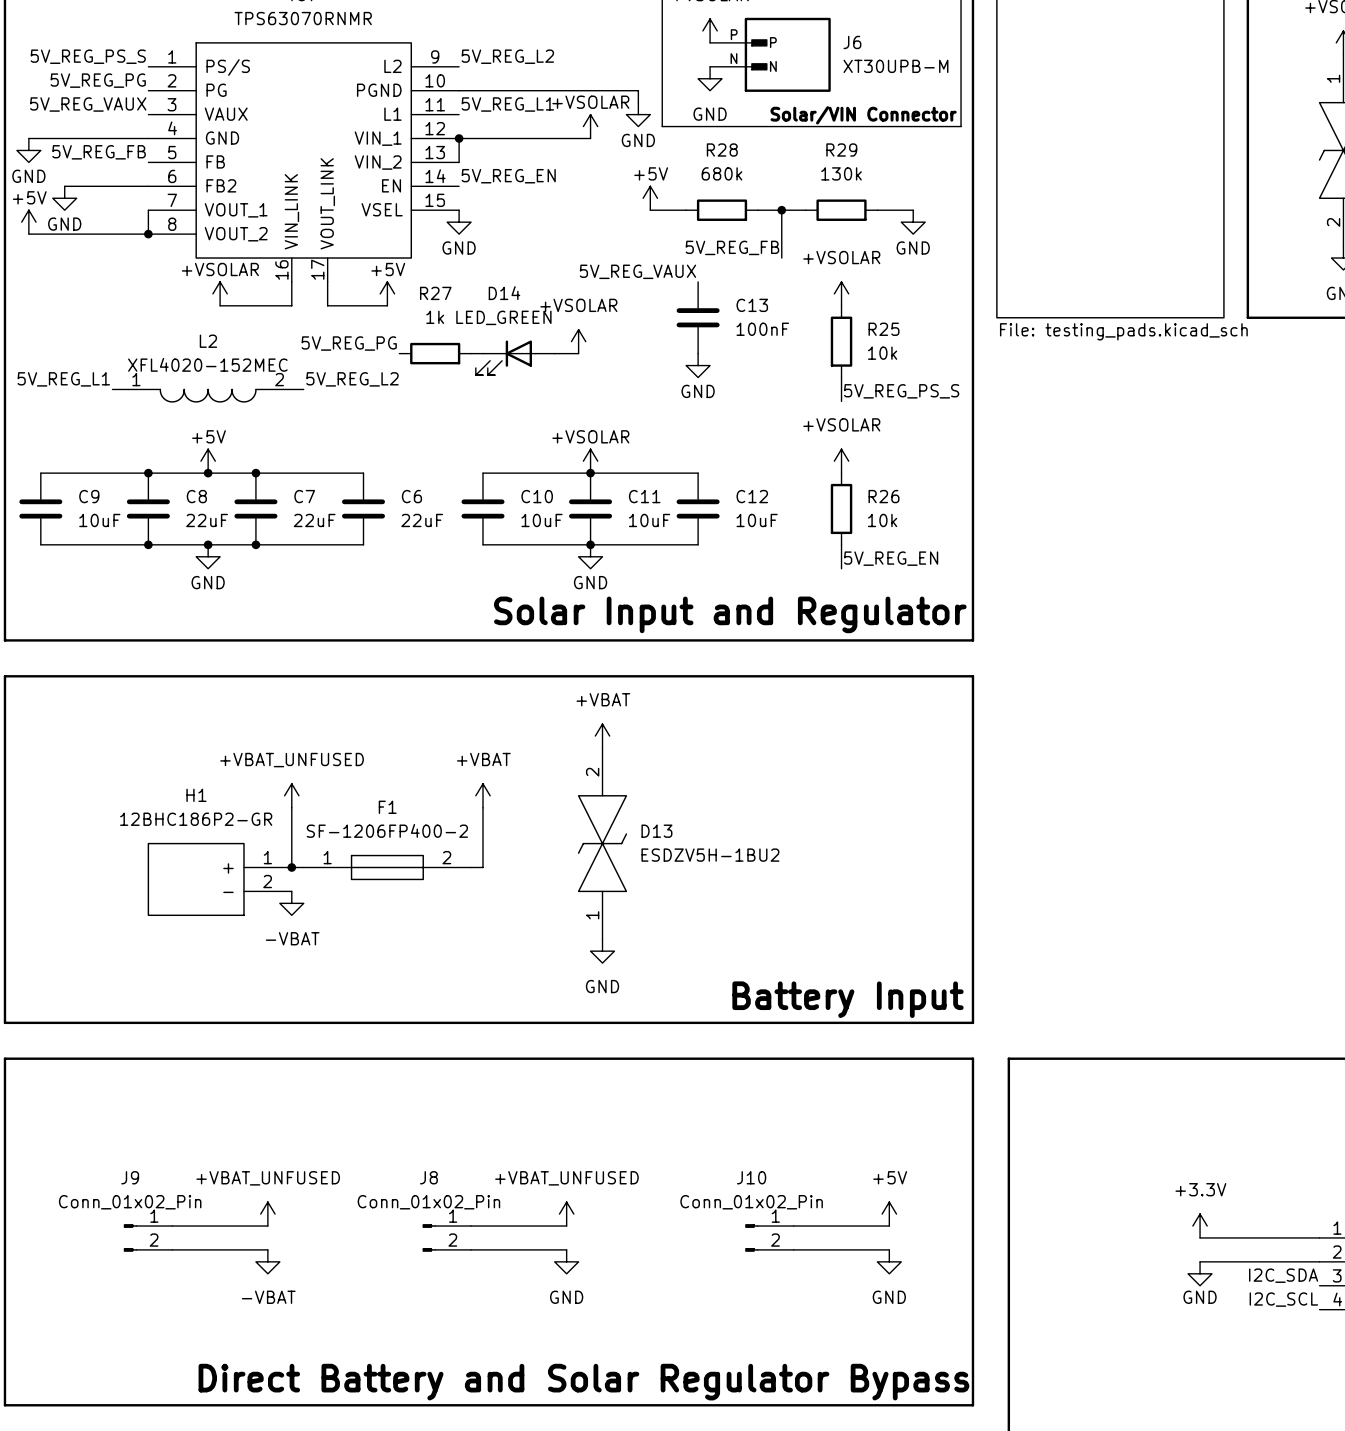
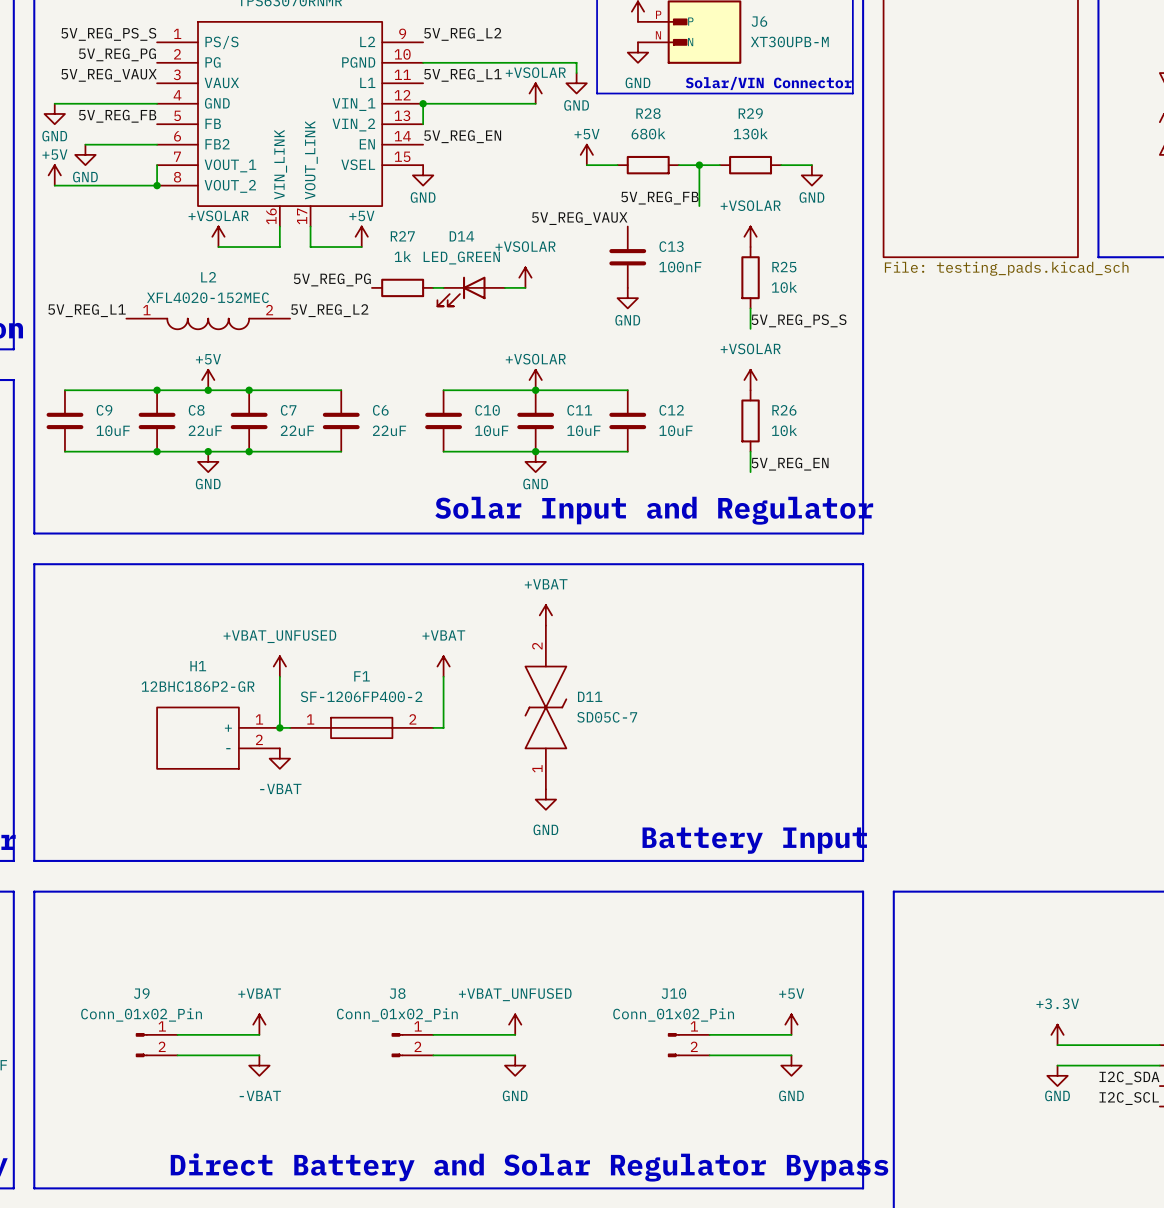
D13 name: D13 (656, 831) -> D11 (590, 696)
D13 value: ESDZV5H-1BU2 (710, 855) -> SD05C-7 (607, 717)
power symbol: +VBAT_UNFUSED (267, 1214) -> +VBAT (259, 1024)

